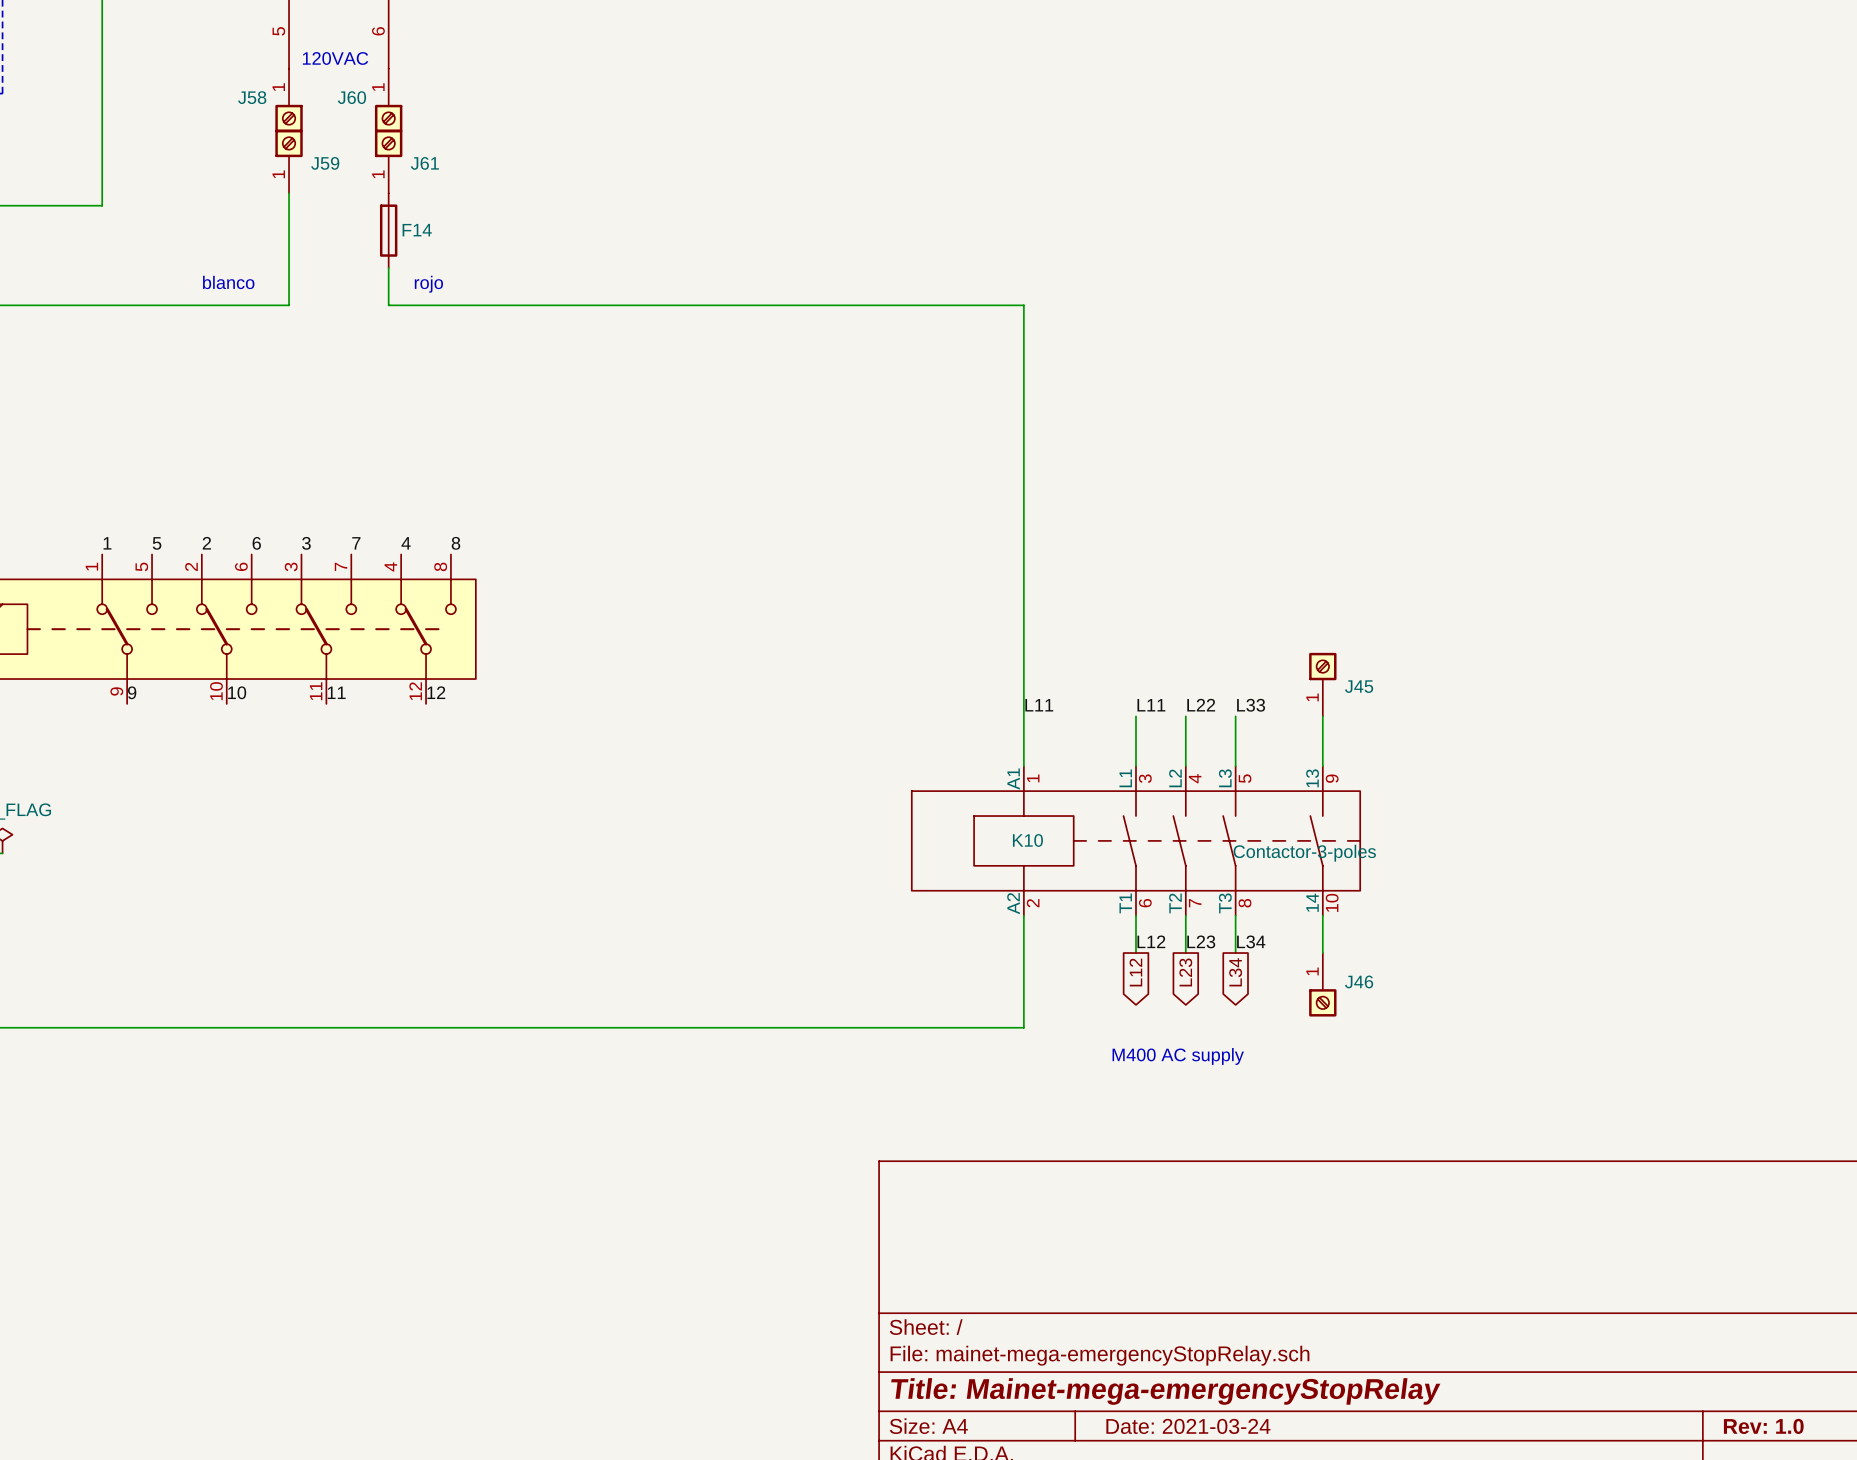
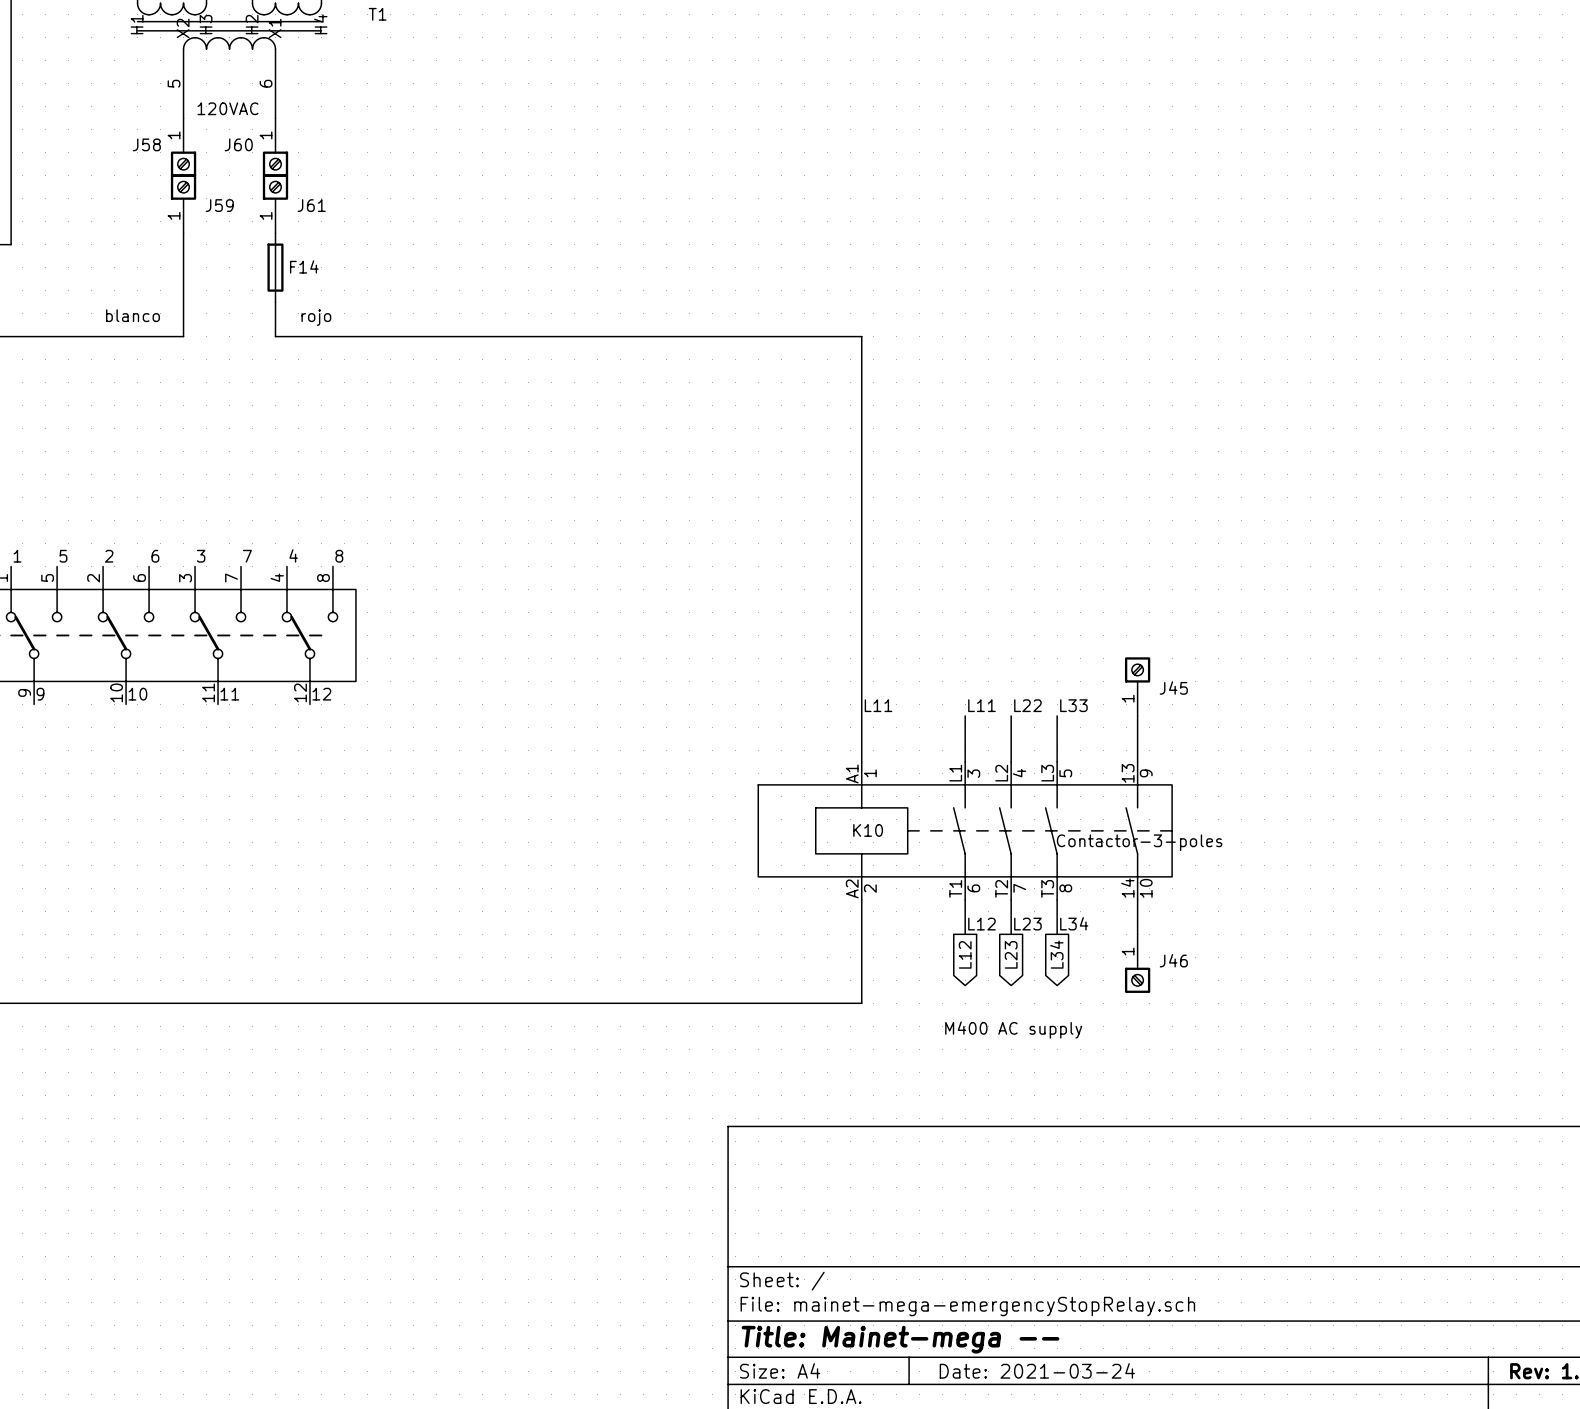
title block: Title: Mainet-mega-emergencyStopRelay (1165, 1391) -> Title: Mainet-mega -- (900, 1339)

